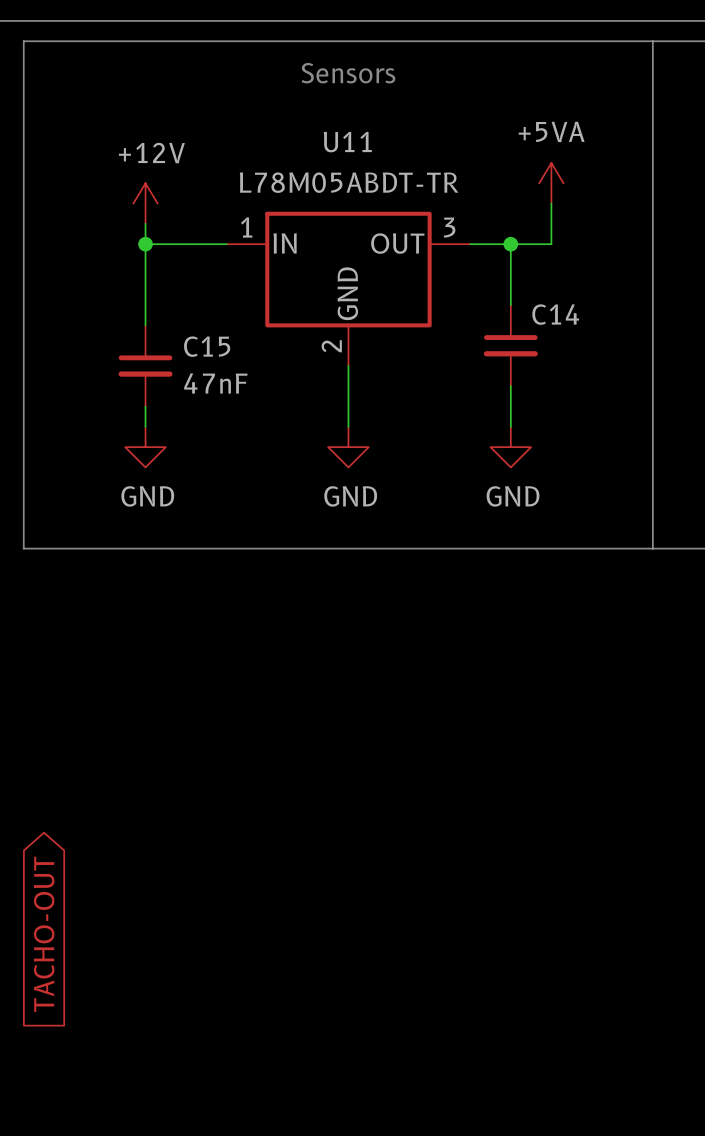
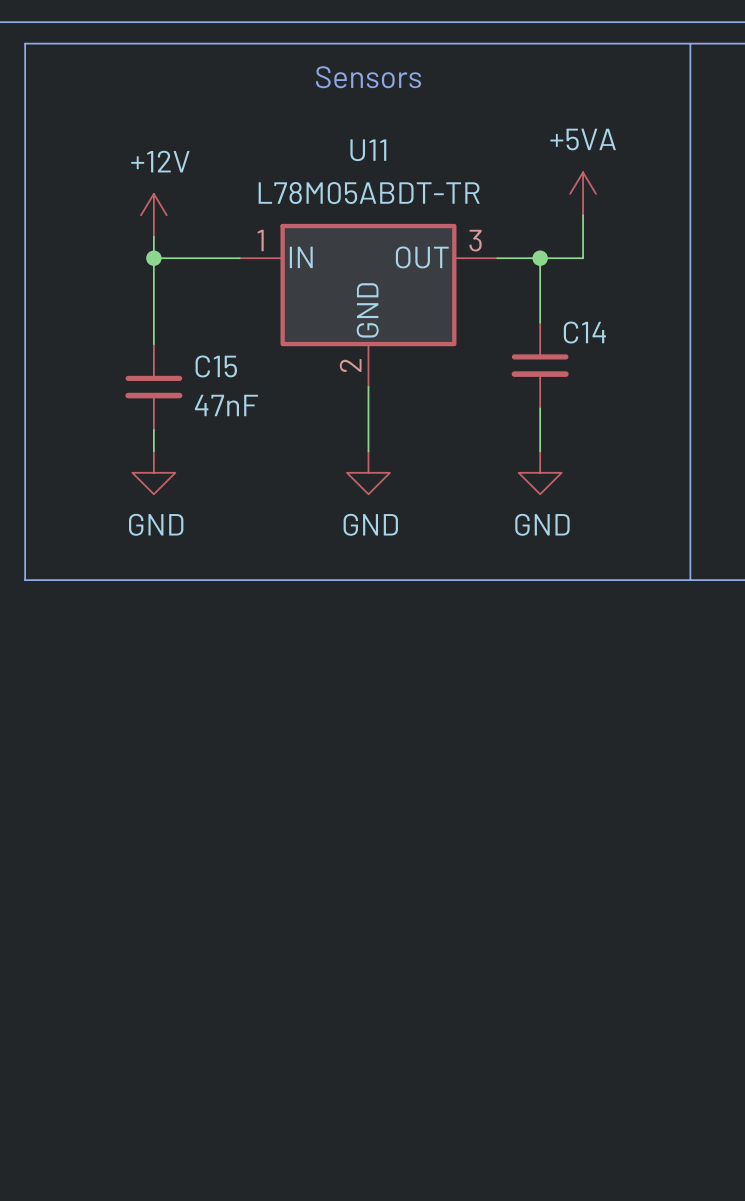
global label: TACHO-OUT (44, 934) -> none

